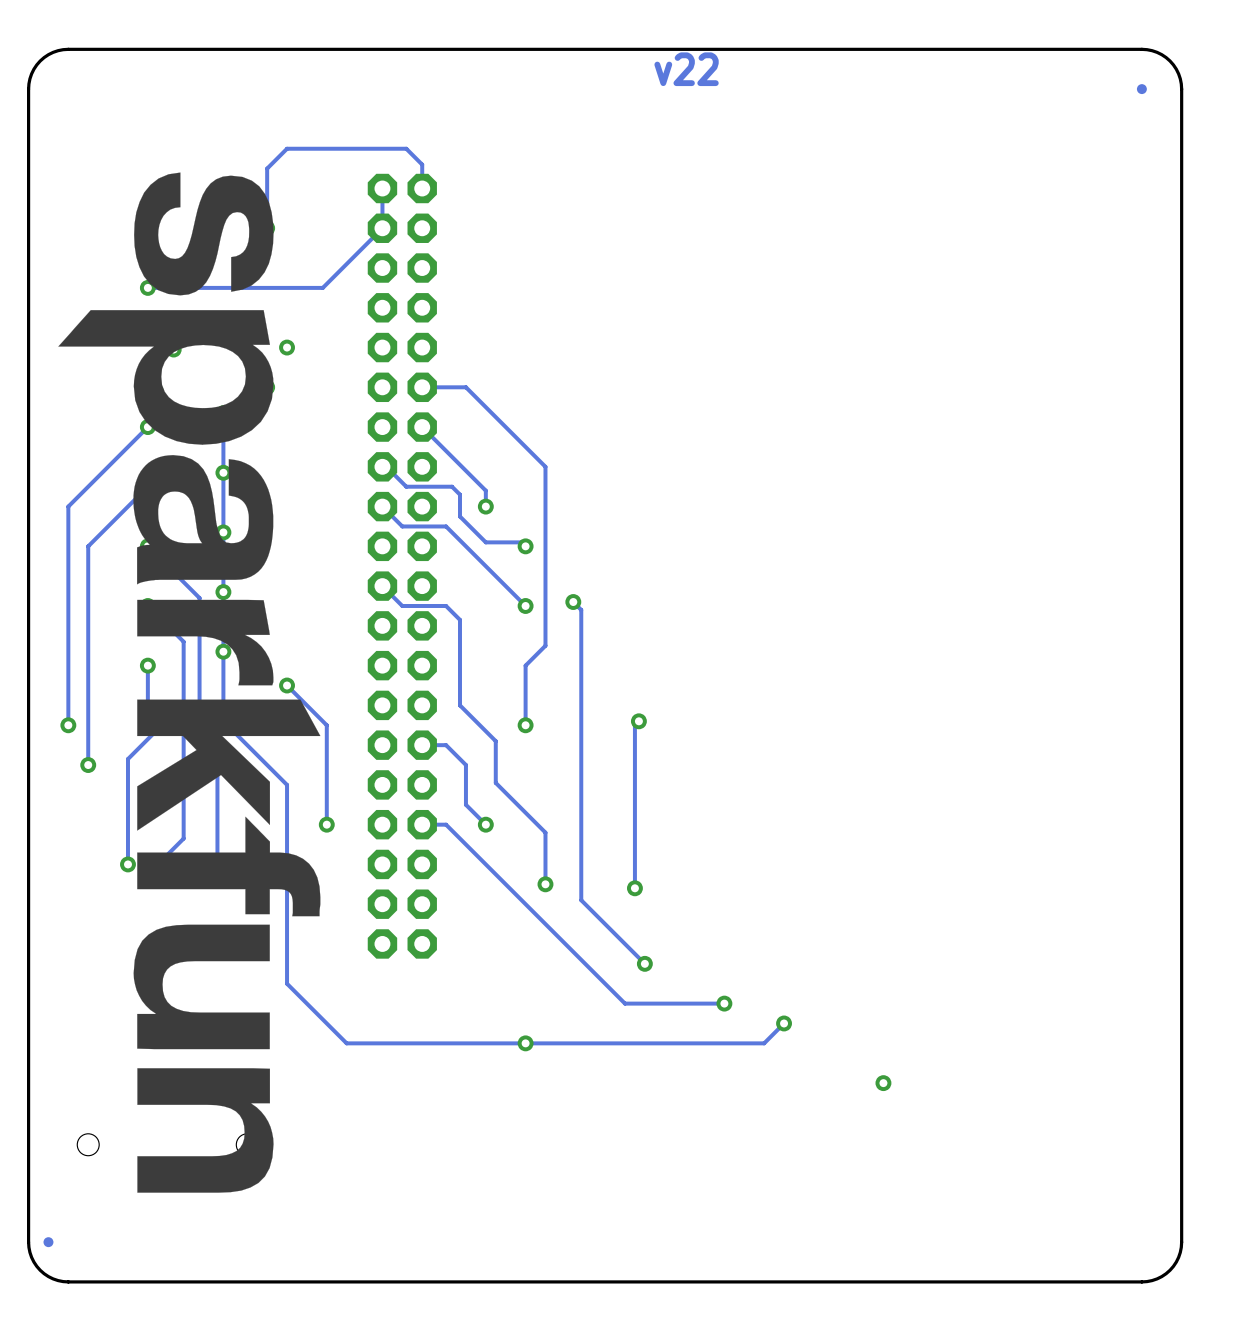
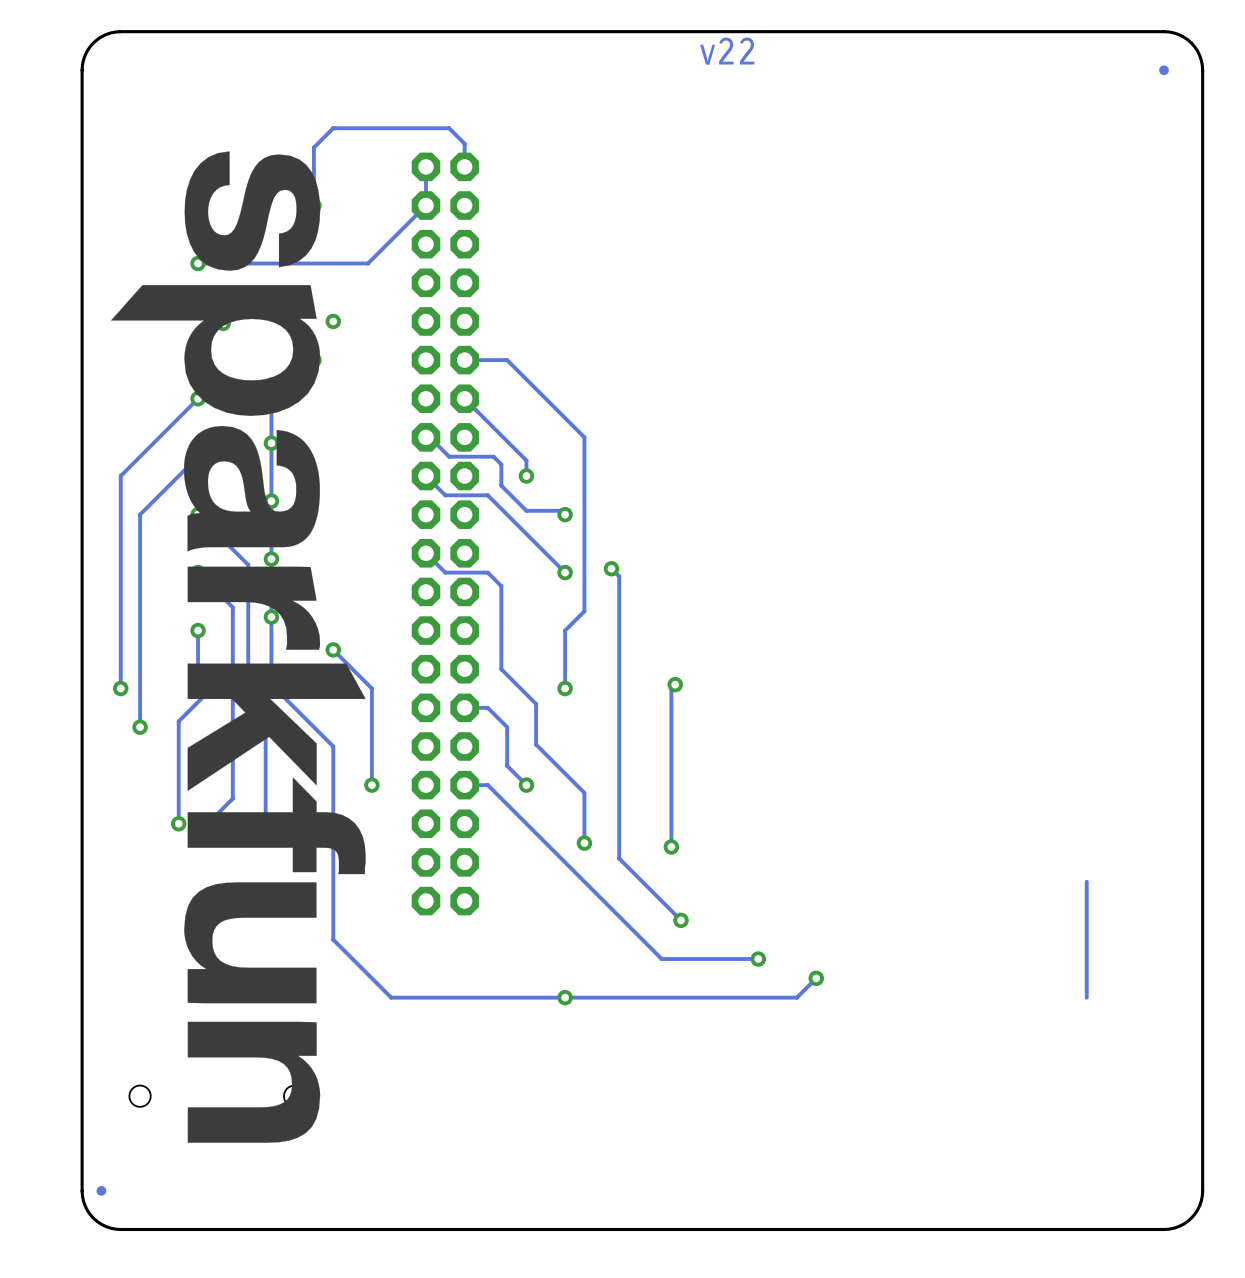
track: none -> (1086, 881) (1086, 997)
via: (883, 1083) -> none

